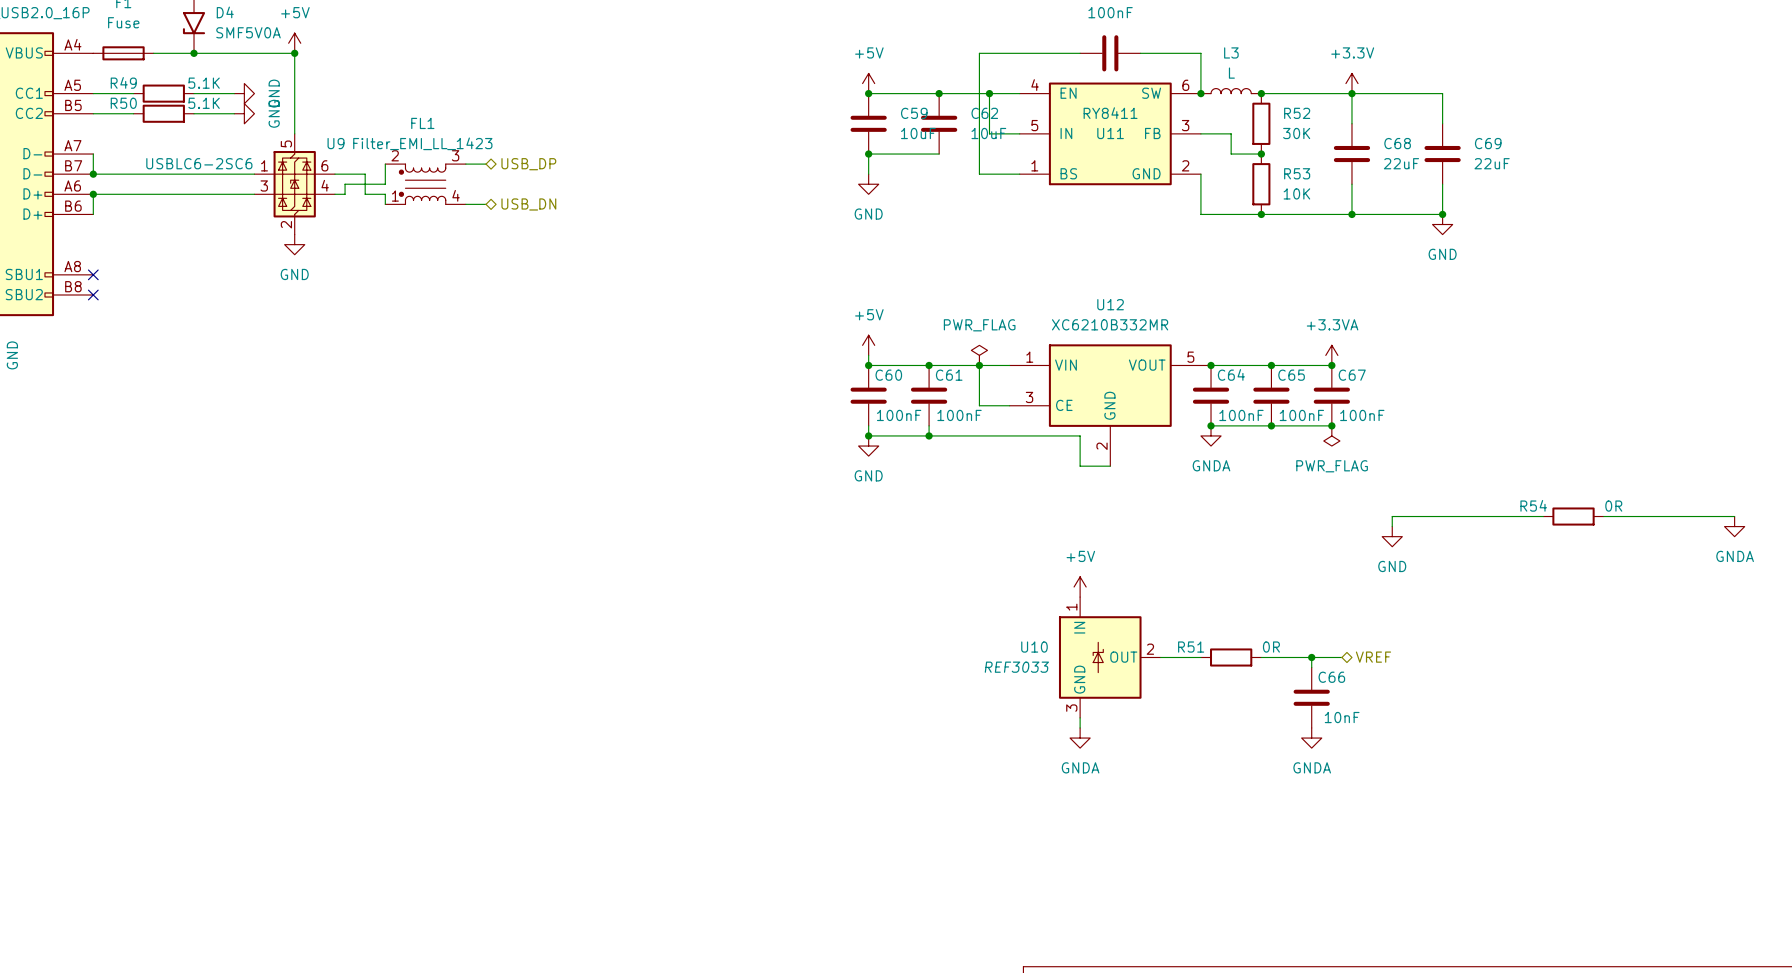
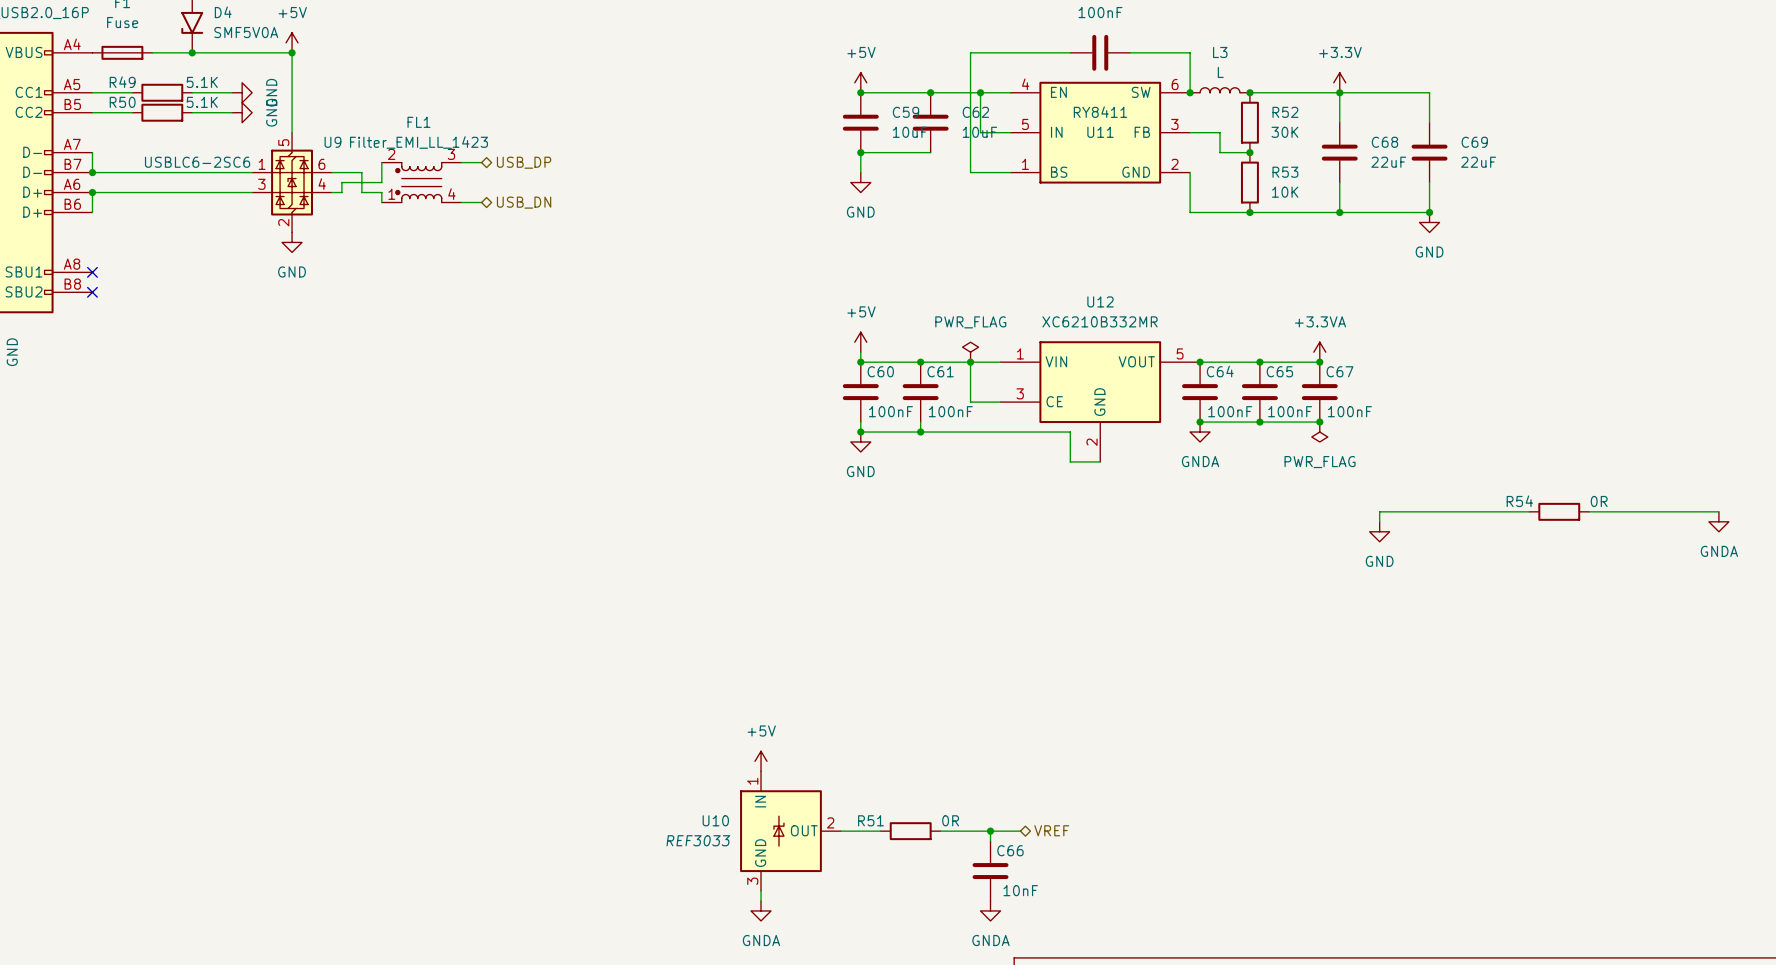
power symbol: +5V (1080, 587) -> none
U10 position: (1109, 657) -> (790, 831)
wire: (1160, 657) (1200, 657) -> none
R51 position: (1231, 657) -> (910, 831)
wire: (1261, 657) (1341, 657) -> none
wire: (1311, 657) (1311, 667) -> none
junction: (1311, 657) -> none
hierarchical label: VREF (1373, 657) -> none
C66 position: (1311, 697) -> (990, 871)
wire: (1080, 717) (1080, 727) -> (990, 831) (990, 841)
power symbol: GNDA (1080, 738) -> none
power symbol: GNDA (1311, 738) -> none
power symbol: none -> +5V (761, 761)
wire: none -> (840, 831) (880, 831)
wire: none -> (940, 831) (1020, 831)
junction: none -> (990, 831)
hierarchical label: none -> VREF (1051, 830)
wire: none -> (761, 891) (761, 900)
power symbol: none -> GNDA (761, 910)
power symbol: none -> GNDA (990, 910)

